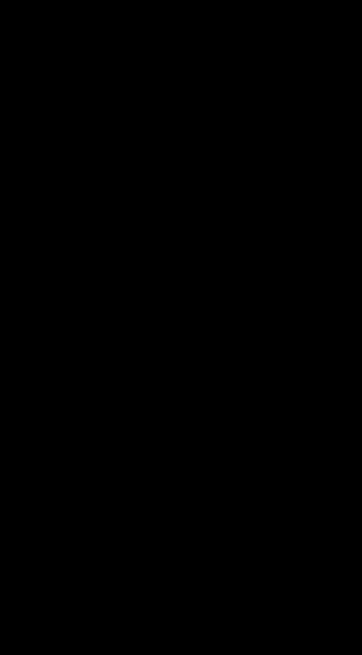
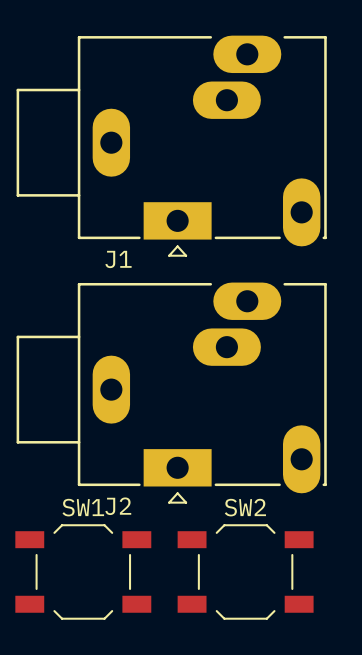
J1: none -> (171, 146)
J2: none -> (171, 393)
SW1: none -> (83, 571)
SW2: none -> (245, 571)

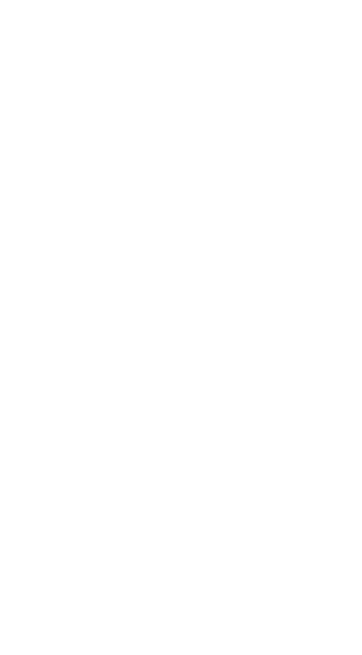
J1: (171, 146) -> none
J2: (171, 393) -> none
SW1: (83, 571) -> none
SW2: (245, 571) -> none

